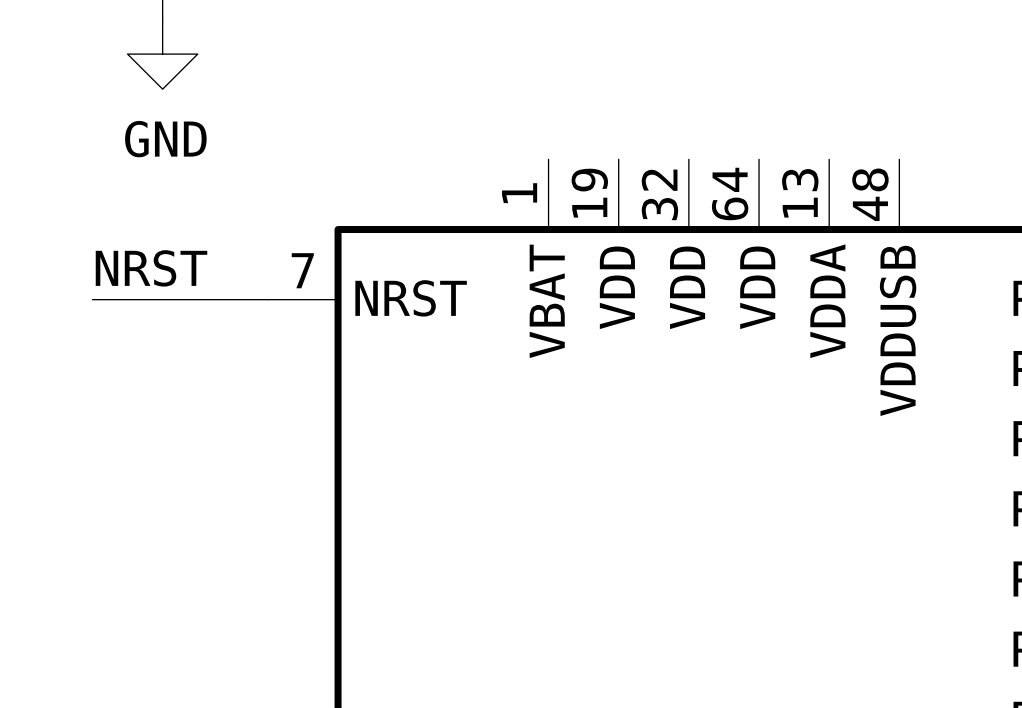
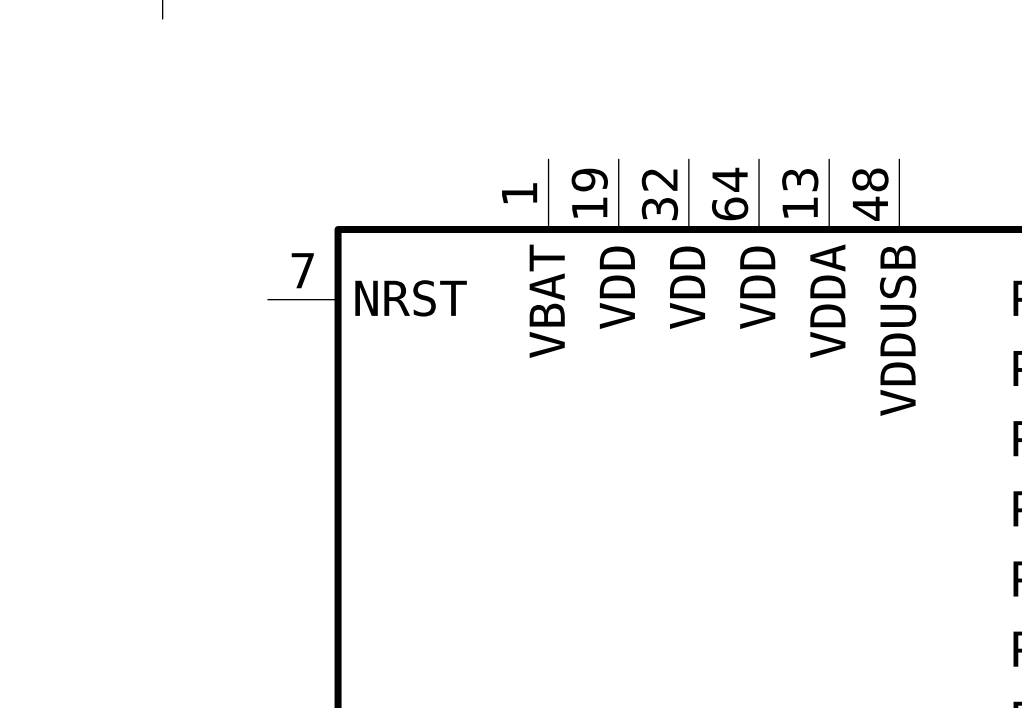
power symbol: GND (162, 54) -> none
label: NRST (151, 268) -> none
wire: (92, 299) (267, 299) -> none

